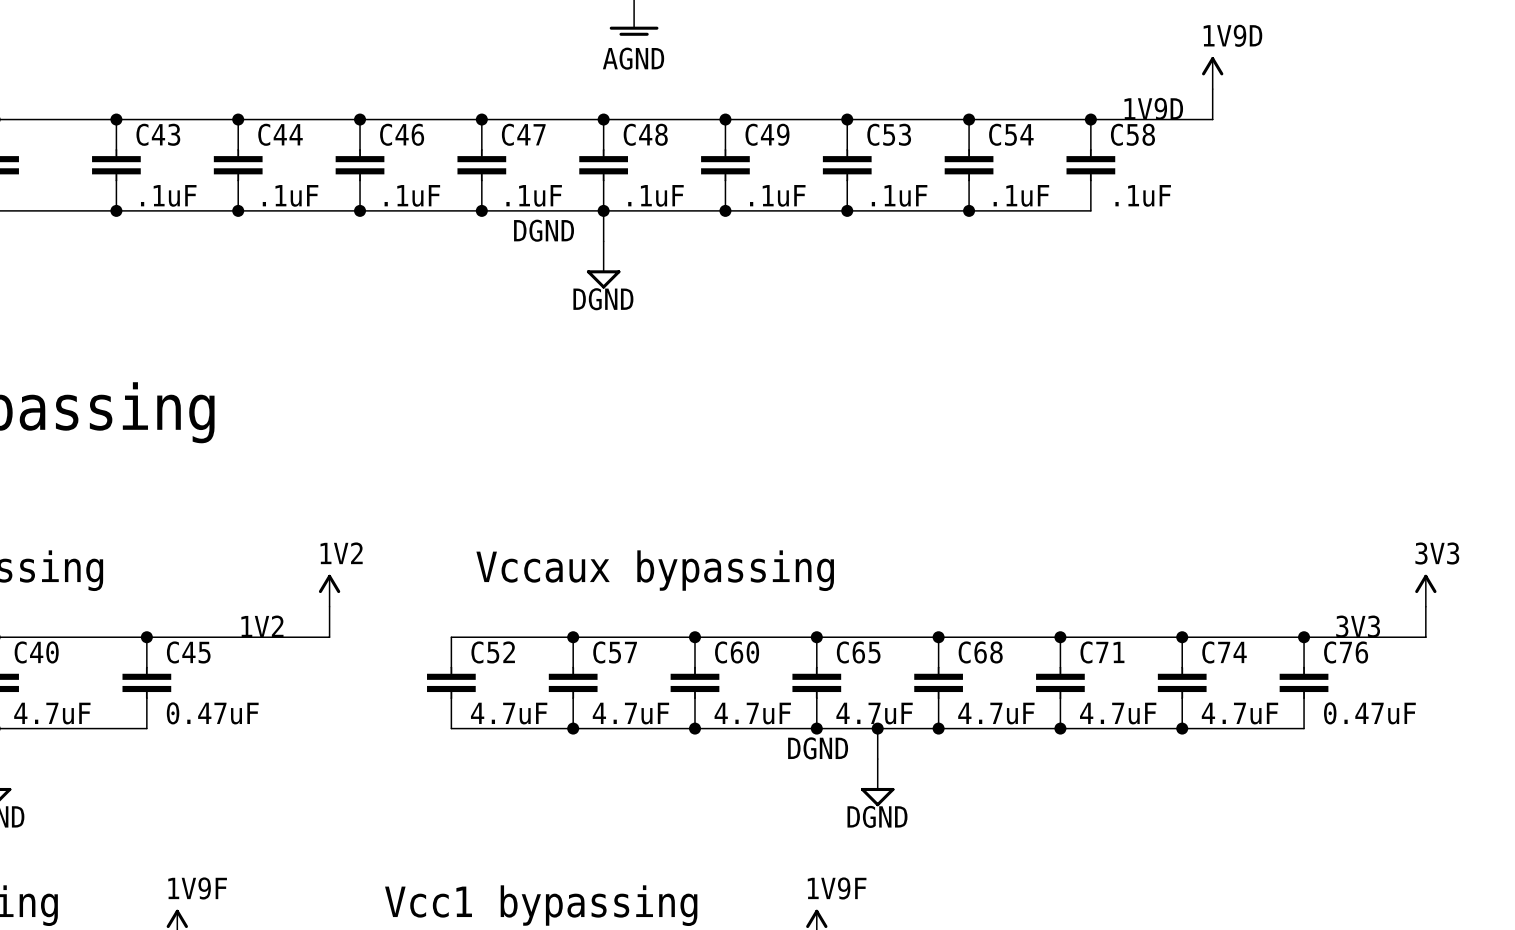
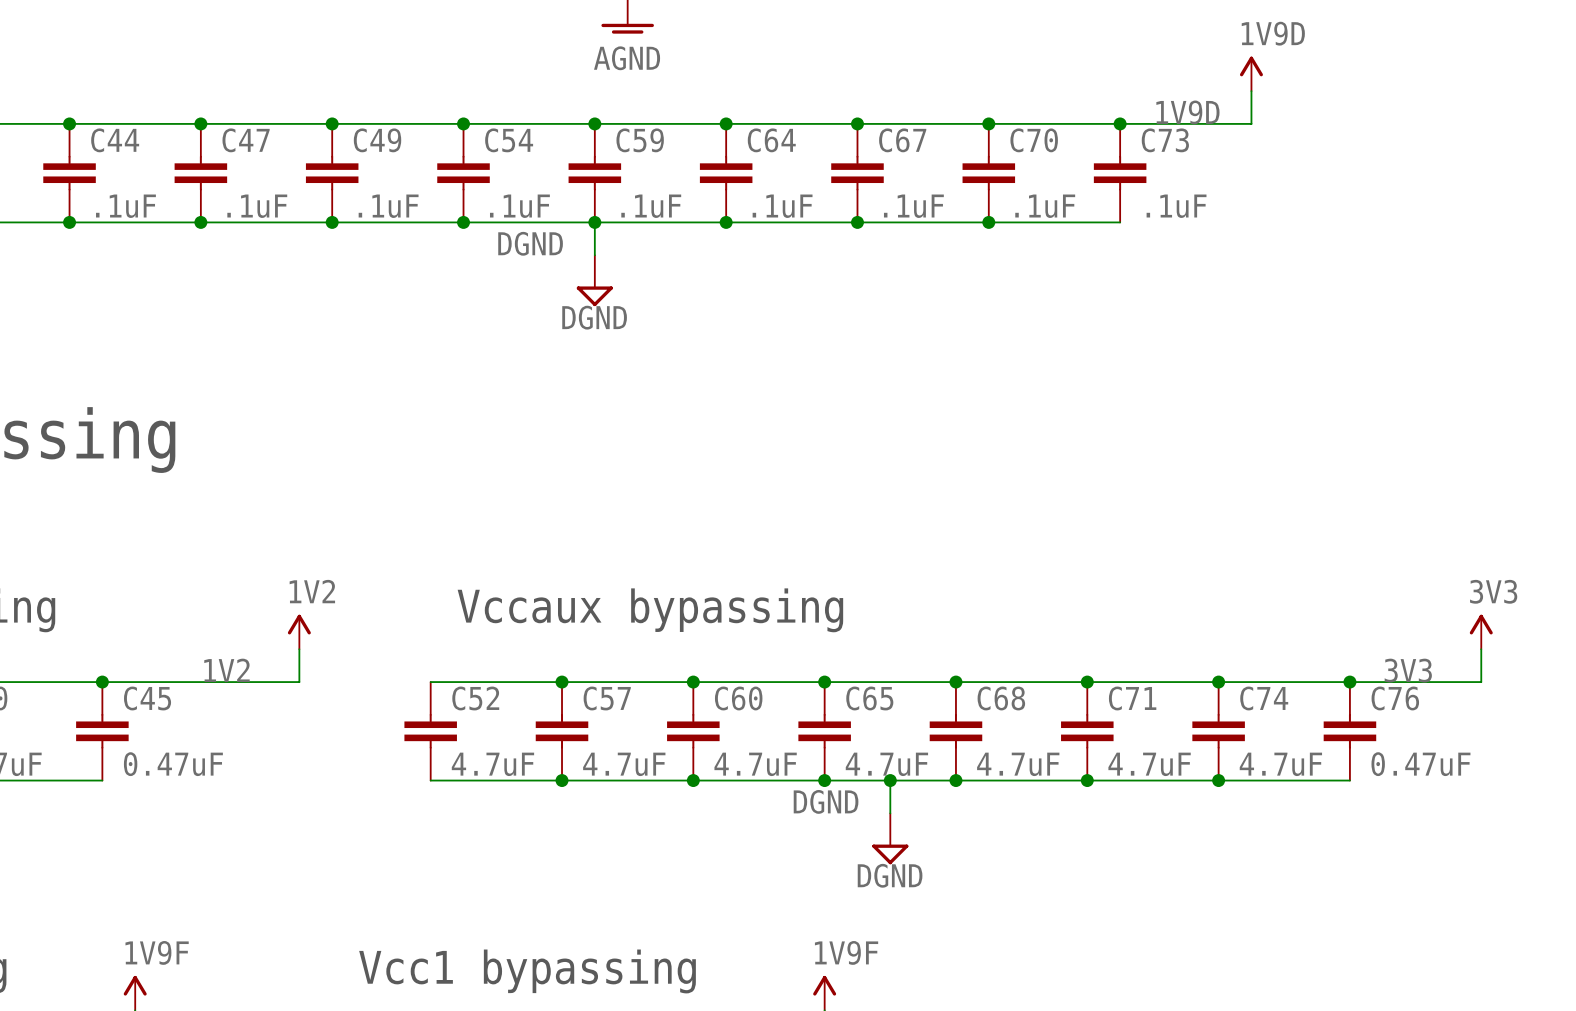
C43 name: C43 (158, 134) -> C44 (115, 140)
C44 name: C44 (280, 134) -> C47 (246, 140)
C46 name: C46 (402, 134) -> C49 (377, 140)
C47 name: C47 (523, 134) -> C54 (509, 140)
C48 name: C48 (645, 134) -> C59 (640, 140)
C49 name: C49 (767, 134) -> C64 (771, 140)
C53 name: C53 (889, 134) -> C67 (902, 140)
C54 name: C54 (1011, 134) -> C70 (1034, 140)
C58 name: C58 (1132, 134) -> C73 (1165, 140)

